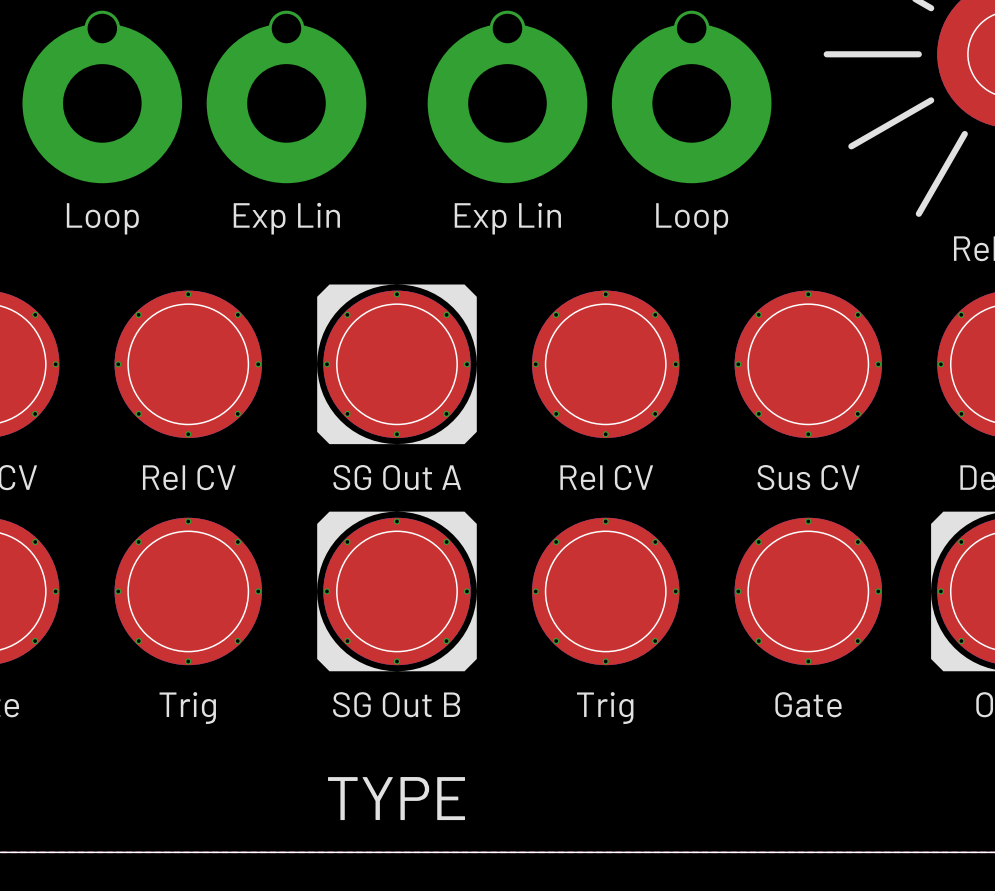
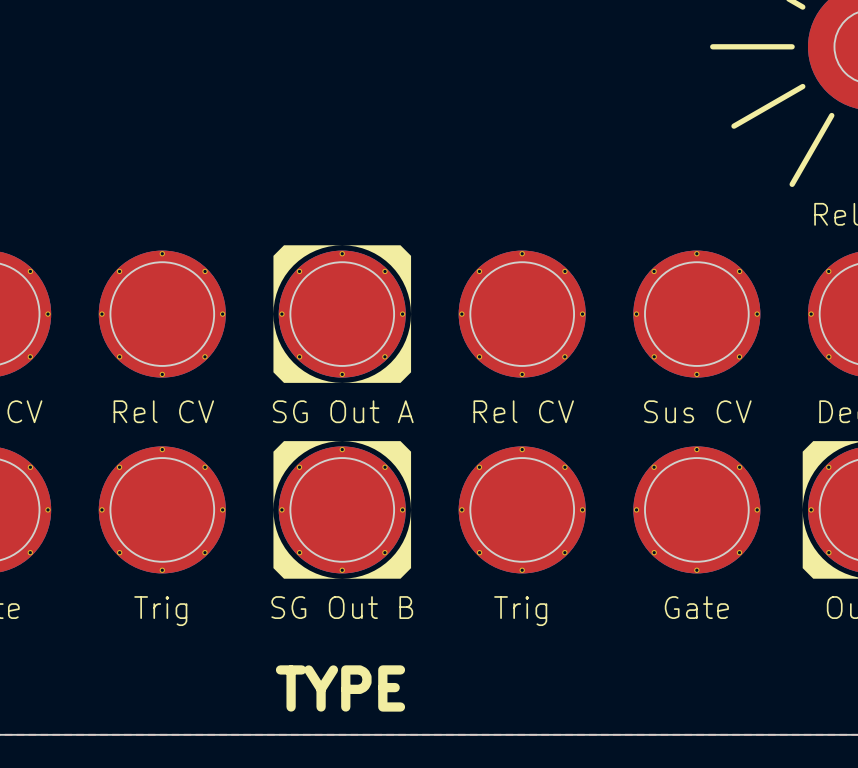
part: Loop (102, 96) -> none
part: Exp Lin (286, 96) -> none
part: Exp Lin (507, 96) -> none
part: Loop (691, 96) -> none

